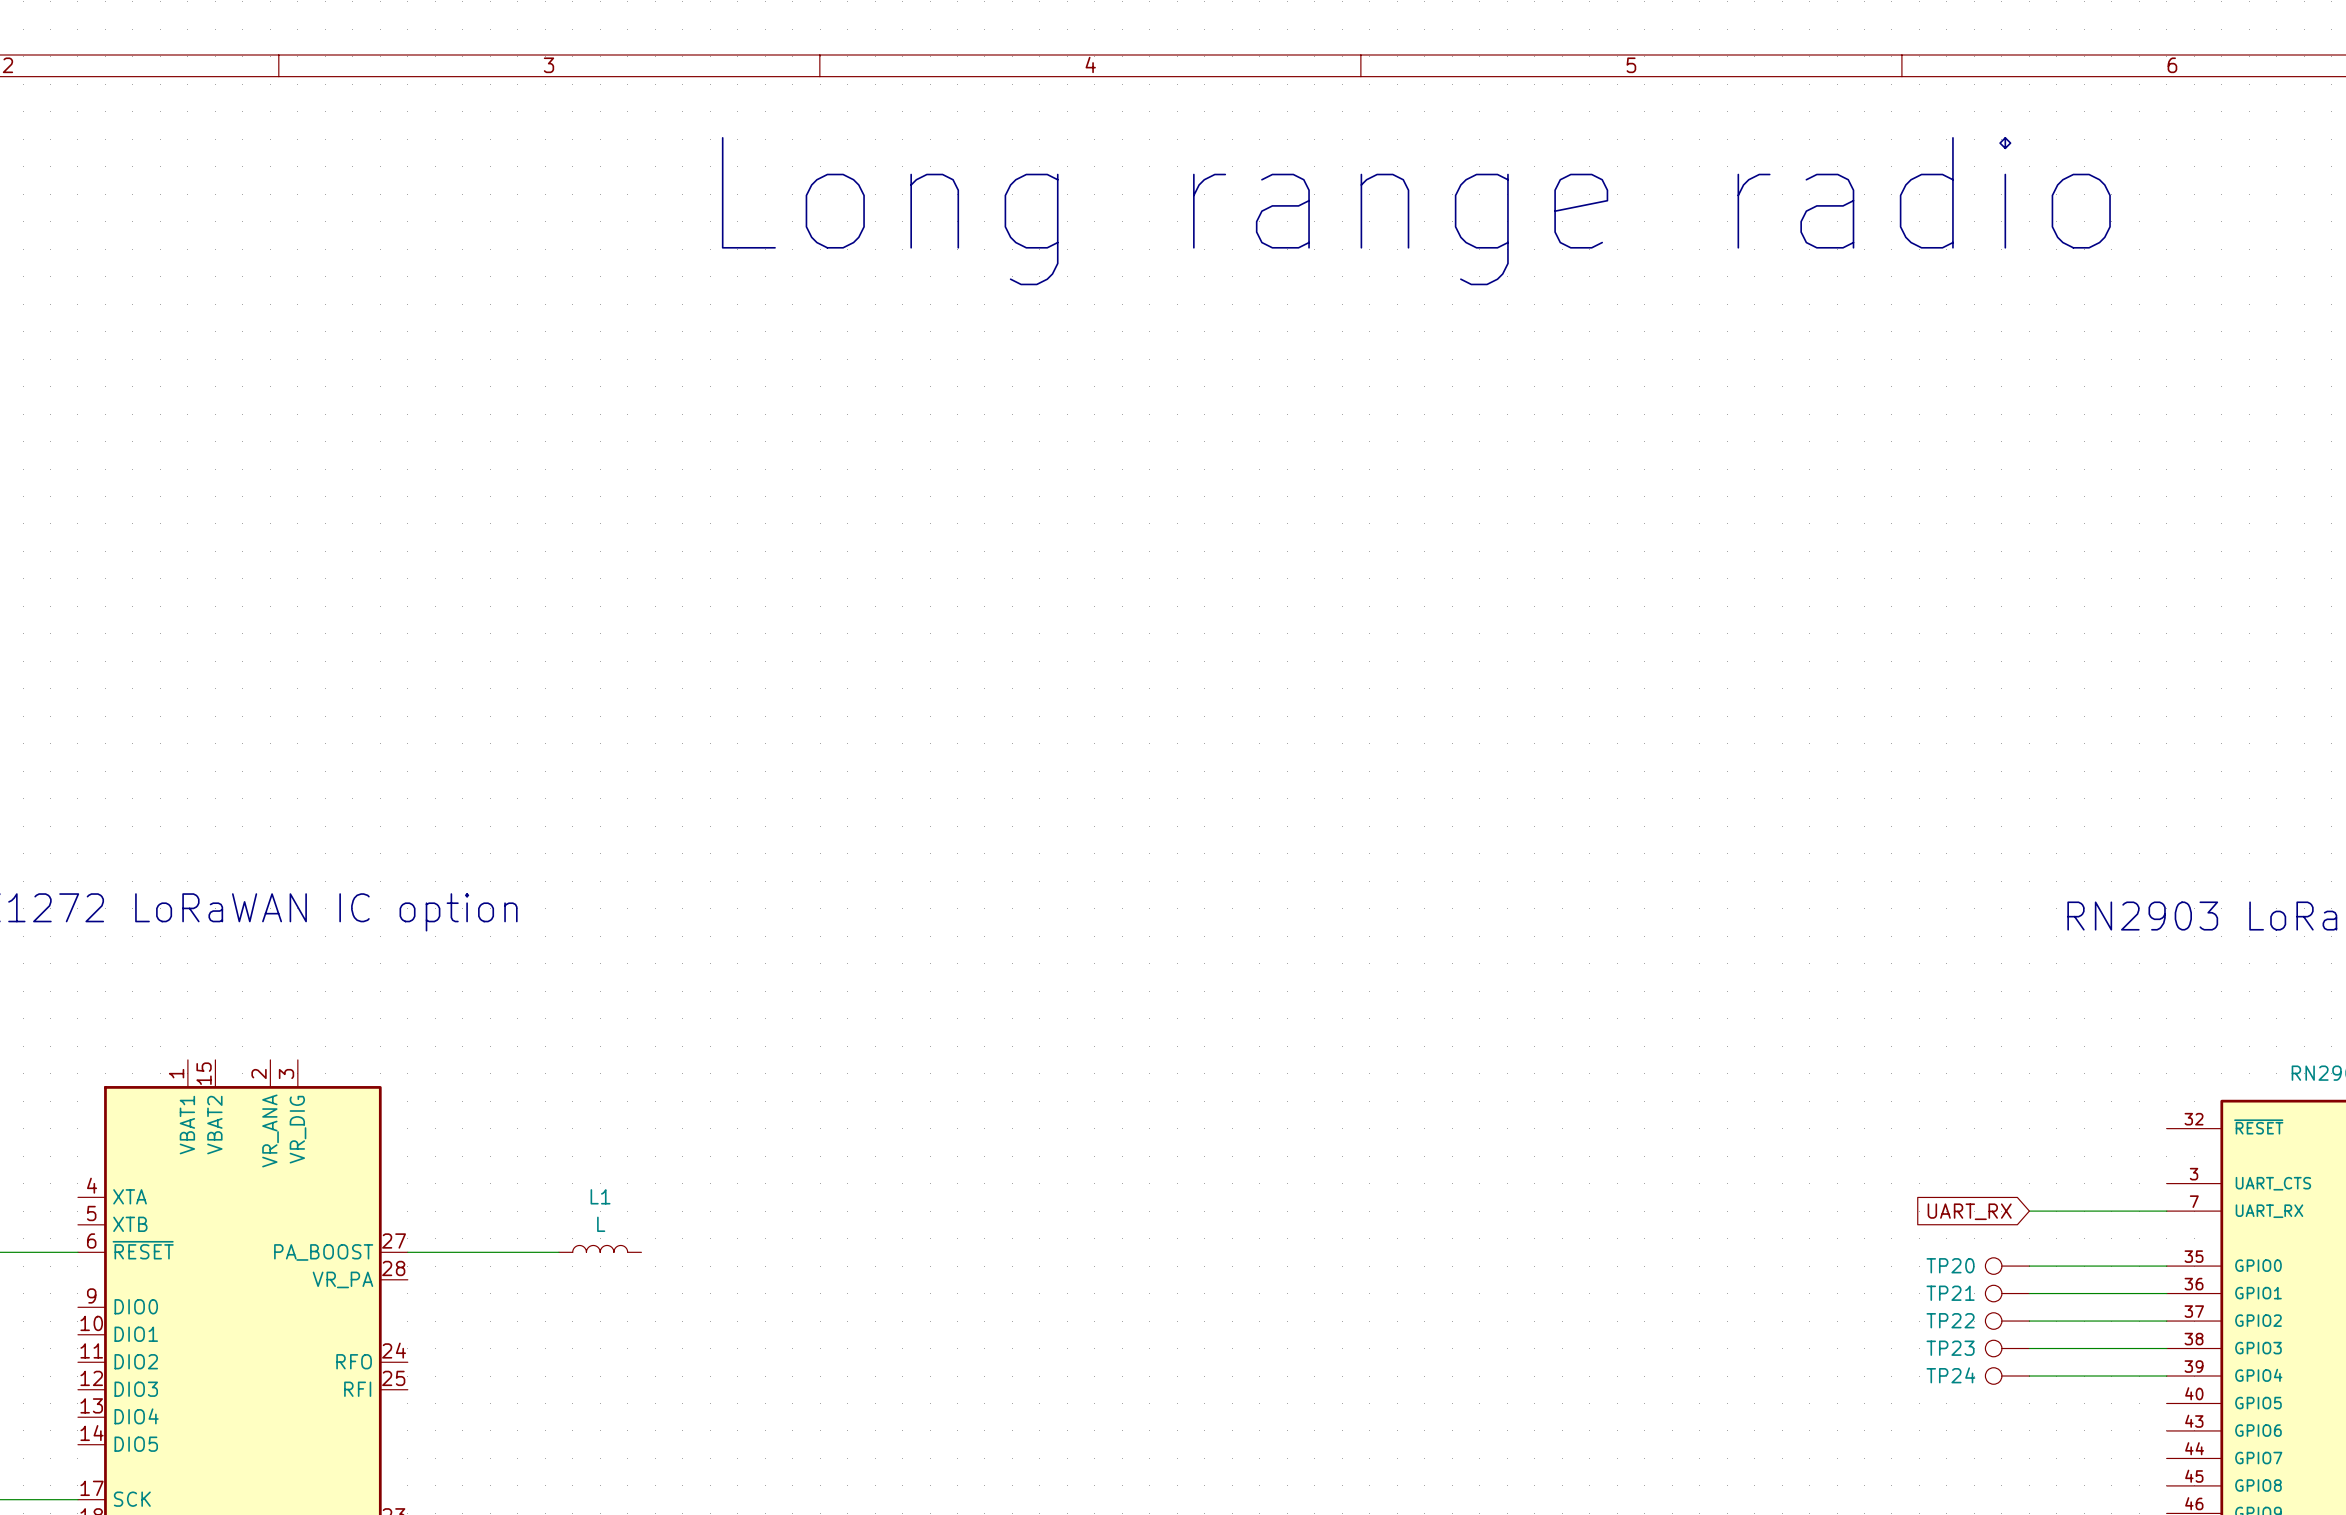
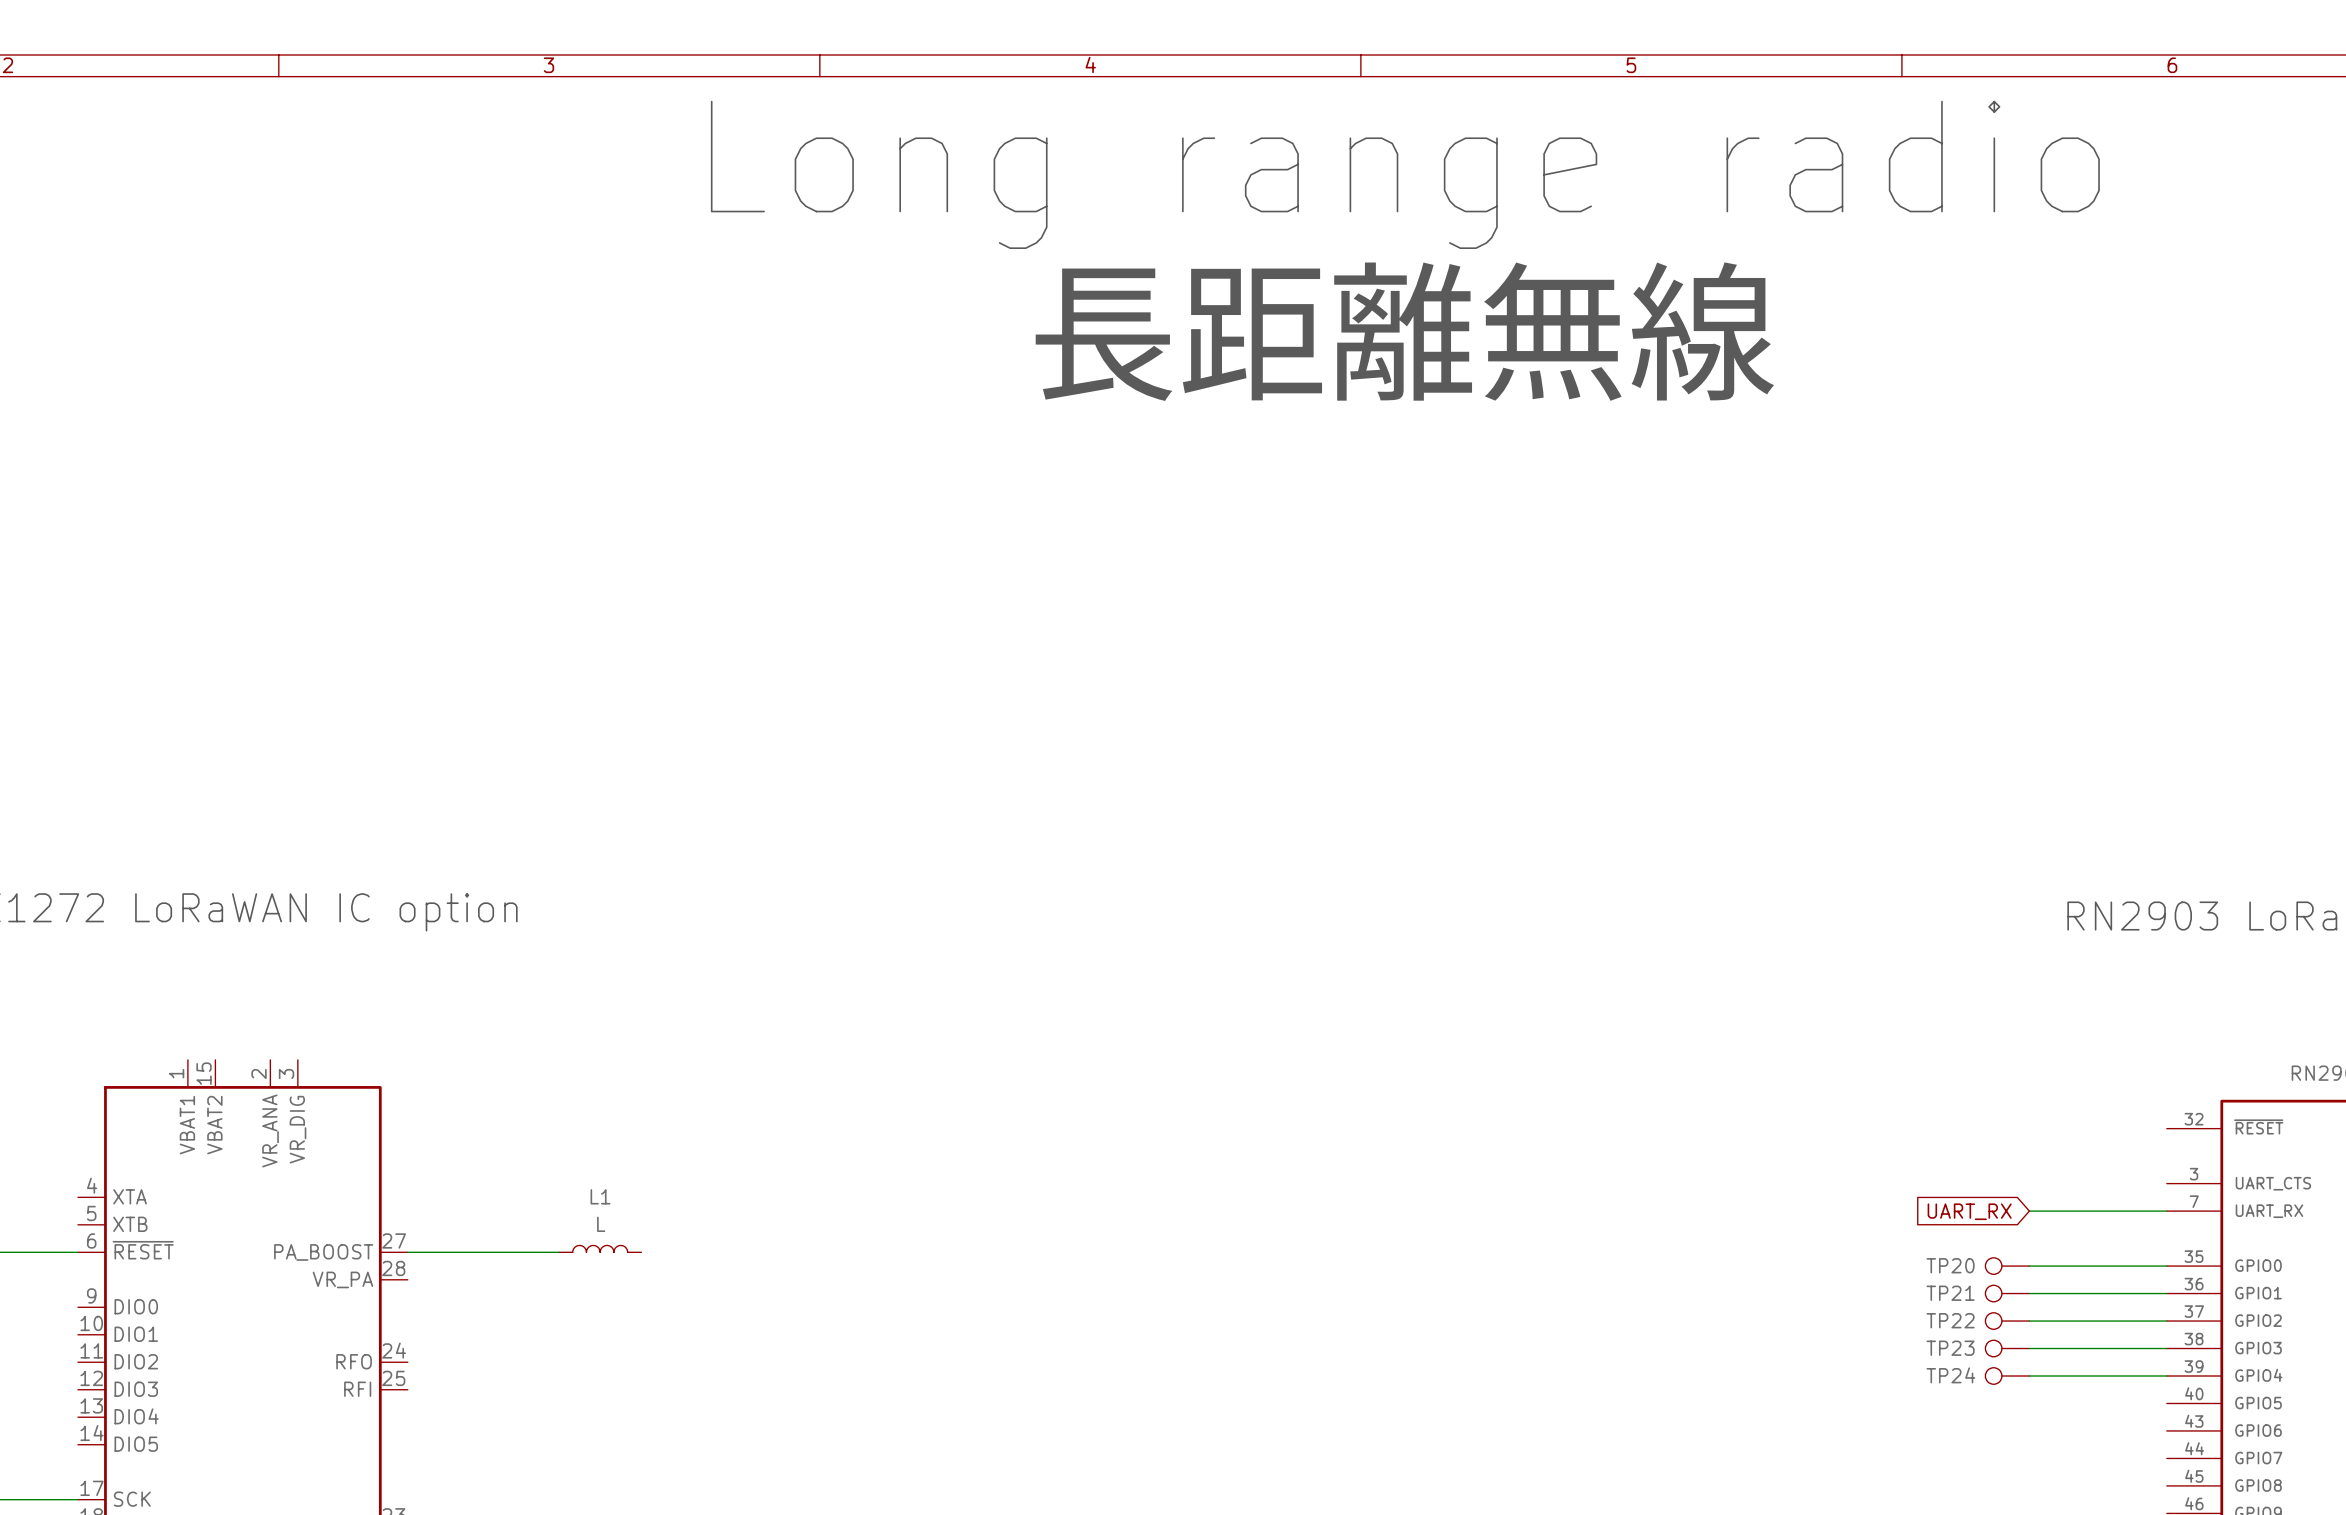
text position: Long range radio (1416, 211) -> Long range radio (1405, 174)
text: none -> 長距離無線 (1404, 331)

